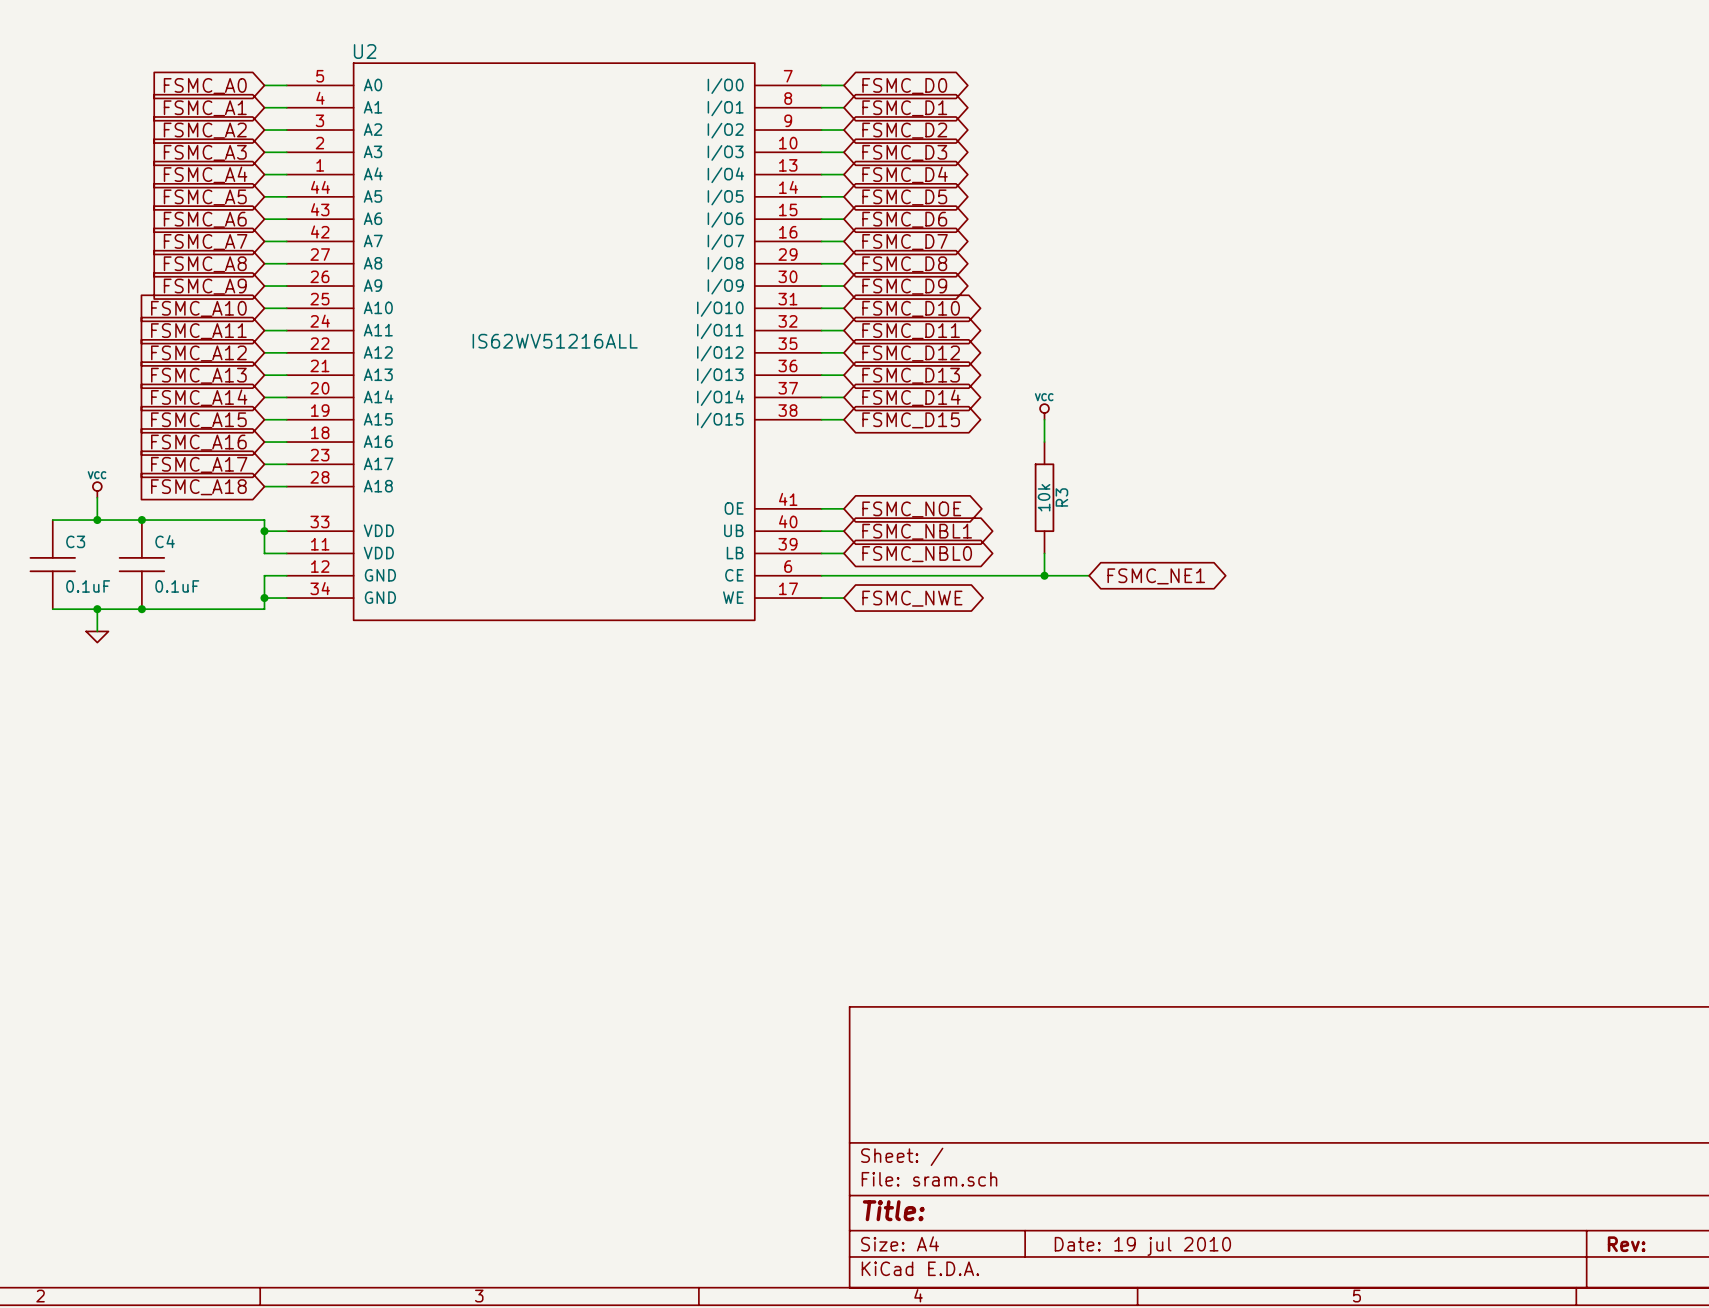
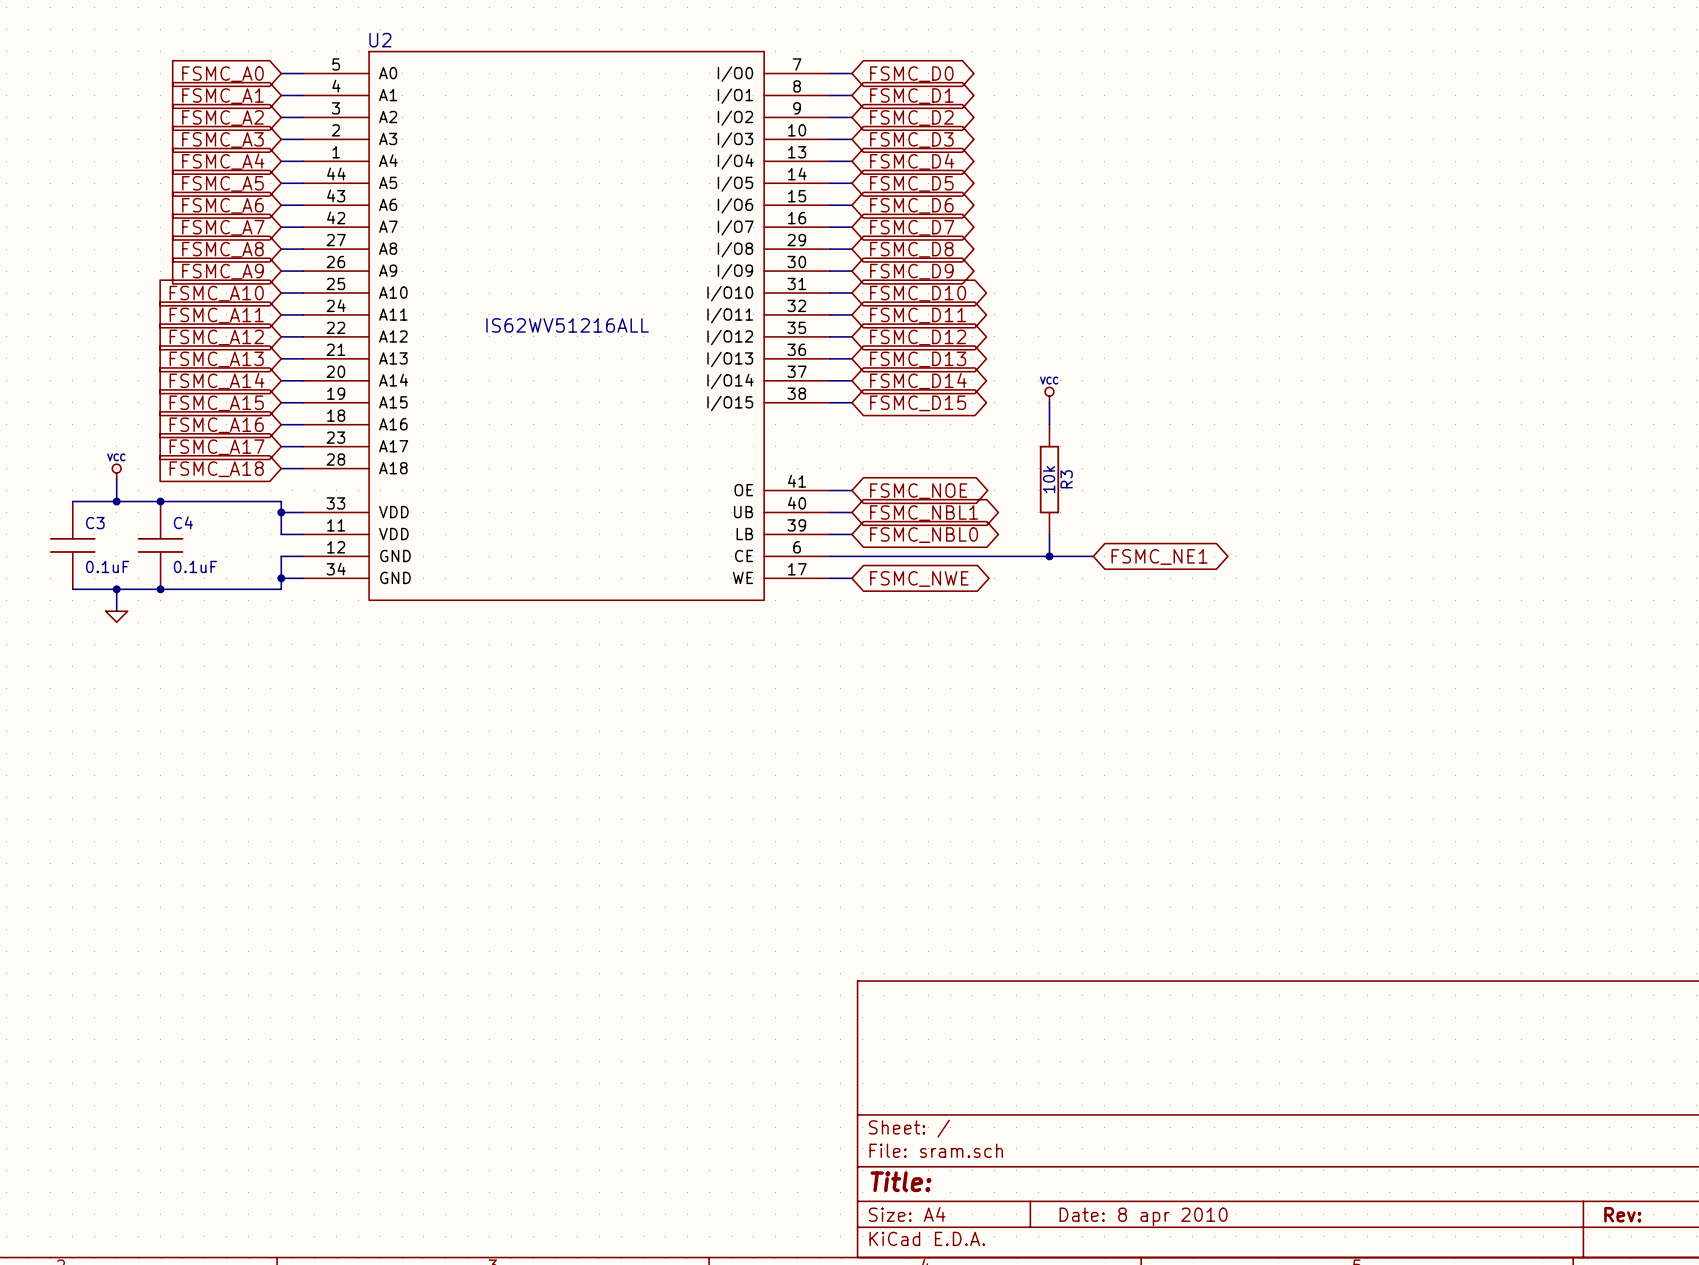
title block: Date: 19 jul 2010 (1142, 1246) -> Date: 8 apr 2010 (1143, 1216)

